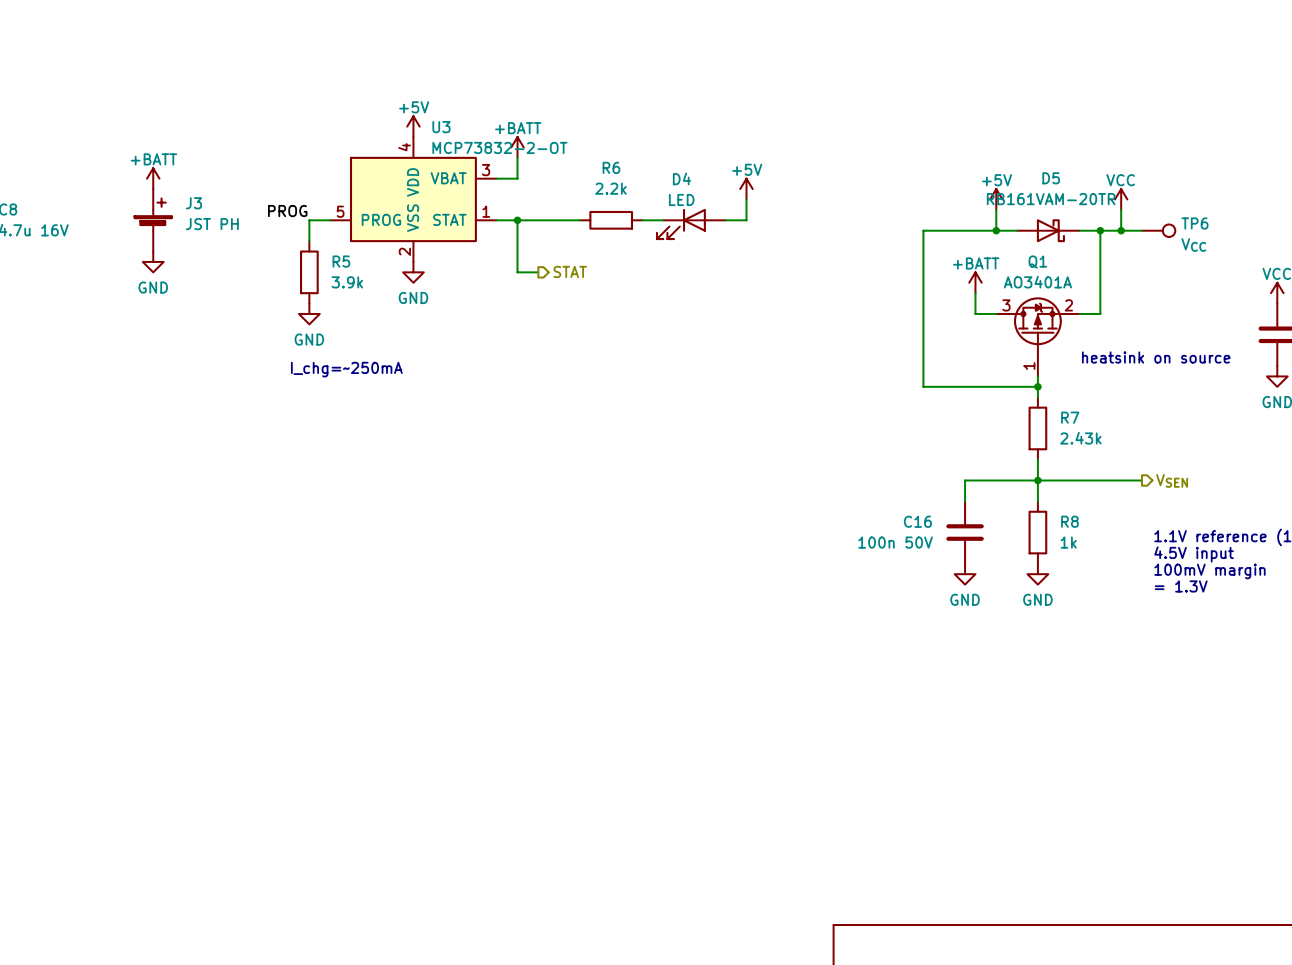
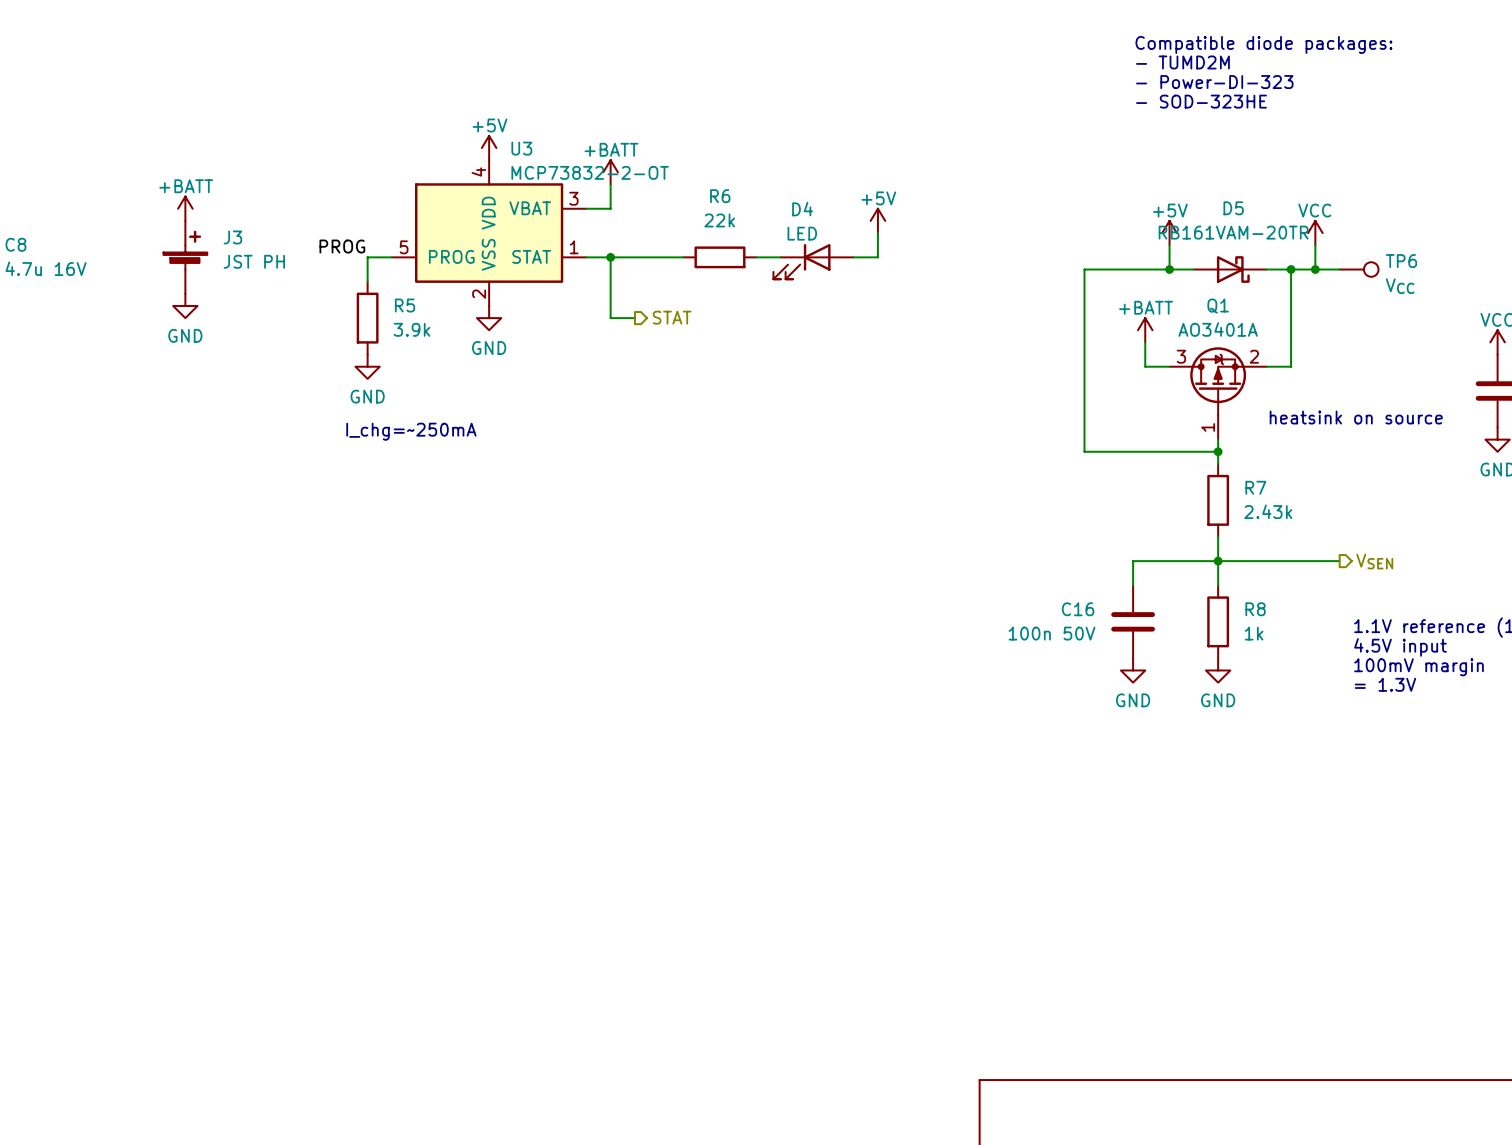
text: none -> Compatible diode packages: (1263, 44)
text: none -> - TUMD2M (1182, 62)
text: none -> - Power-DI-323 (1214, 82)
text: none -> - SOD-323HE (1201, 101)
R6 value: 2.2k (610, 188) -> 22k (719, 220)

